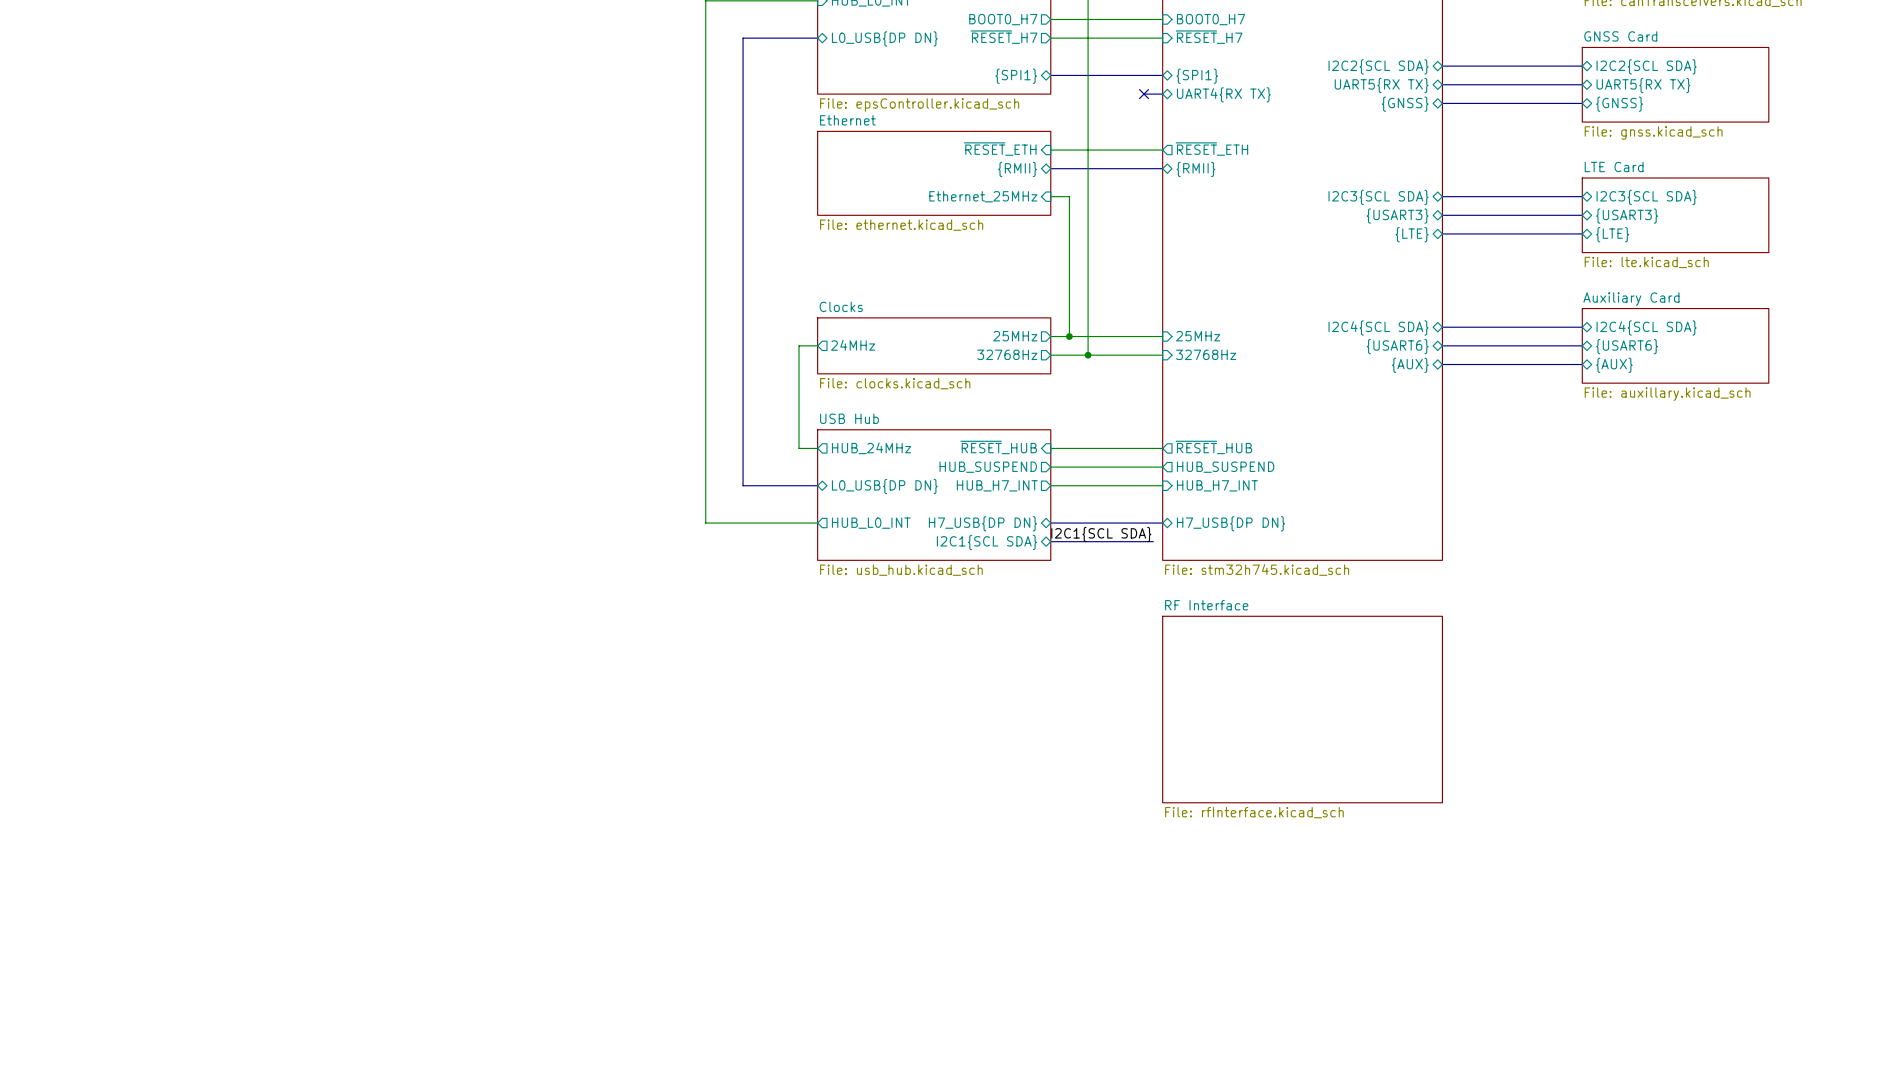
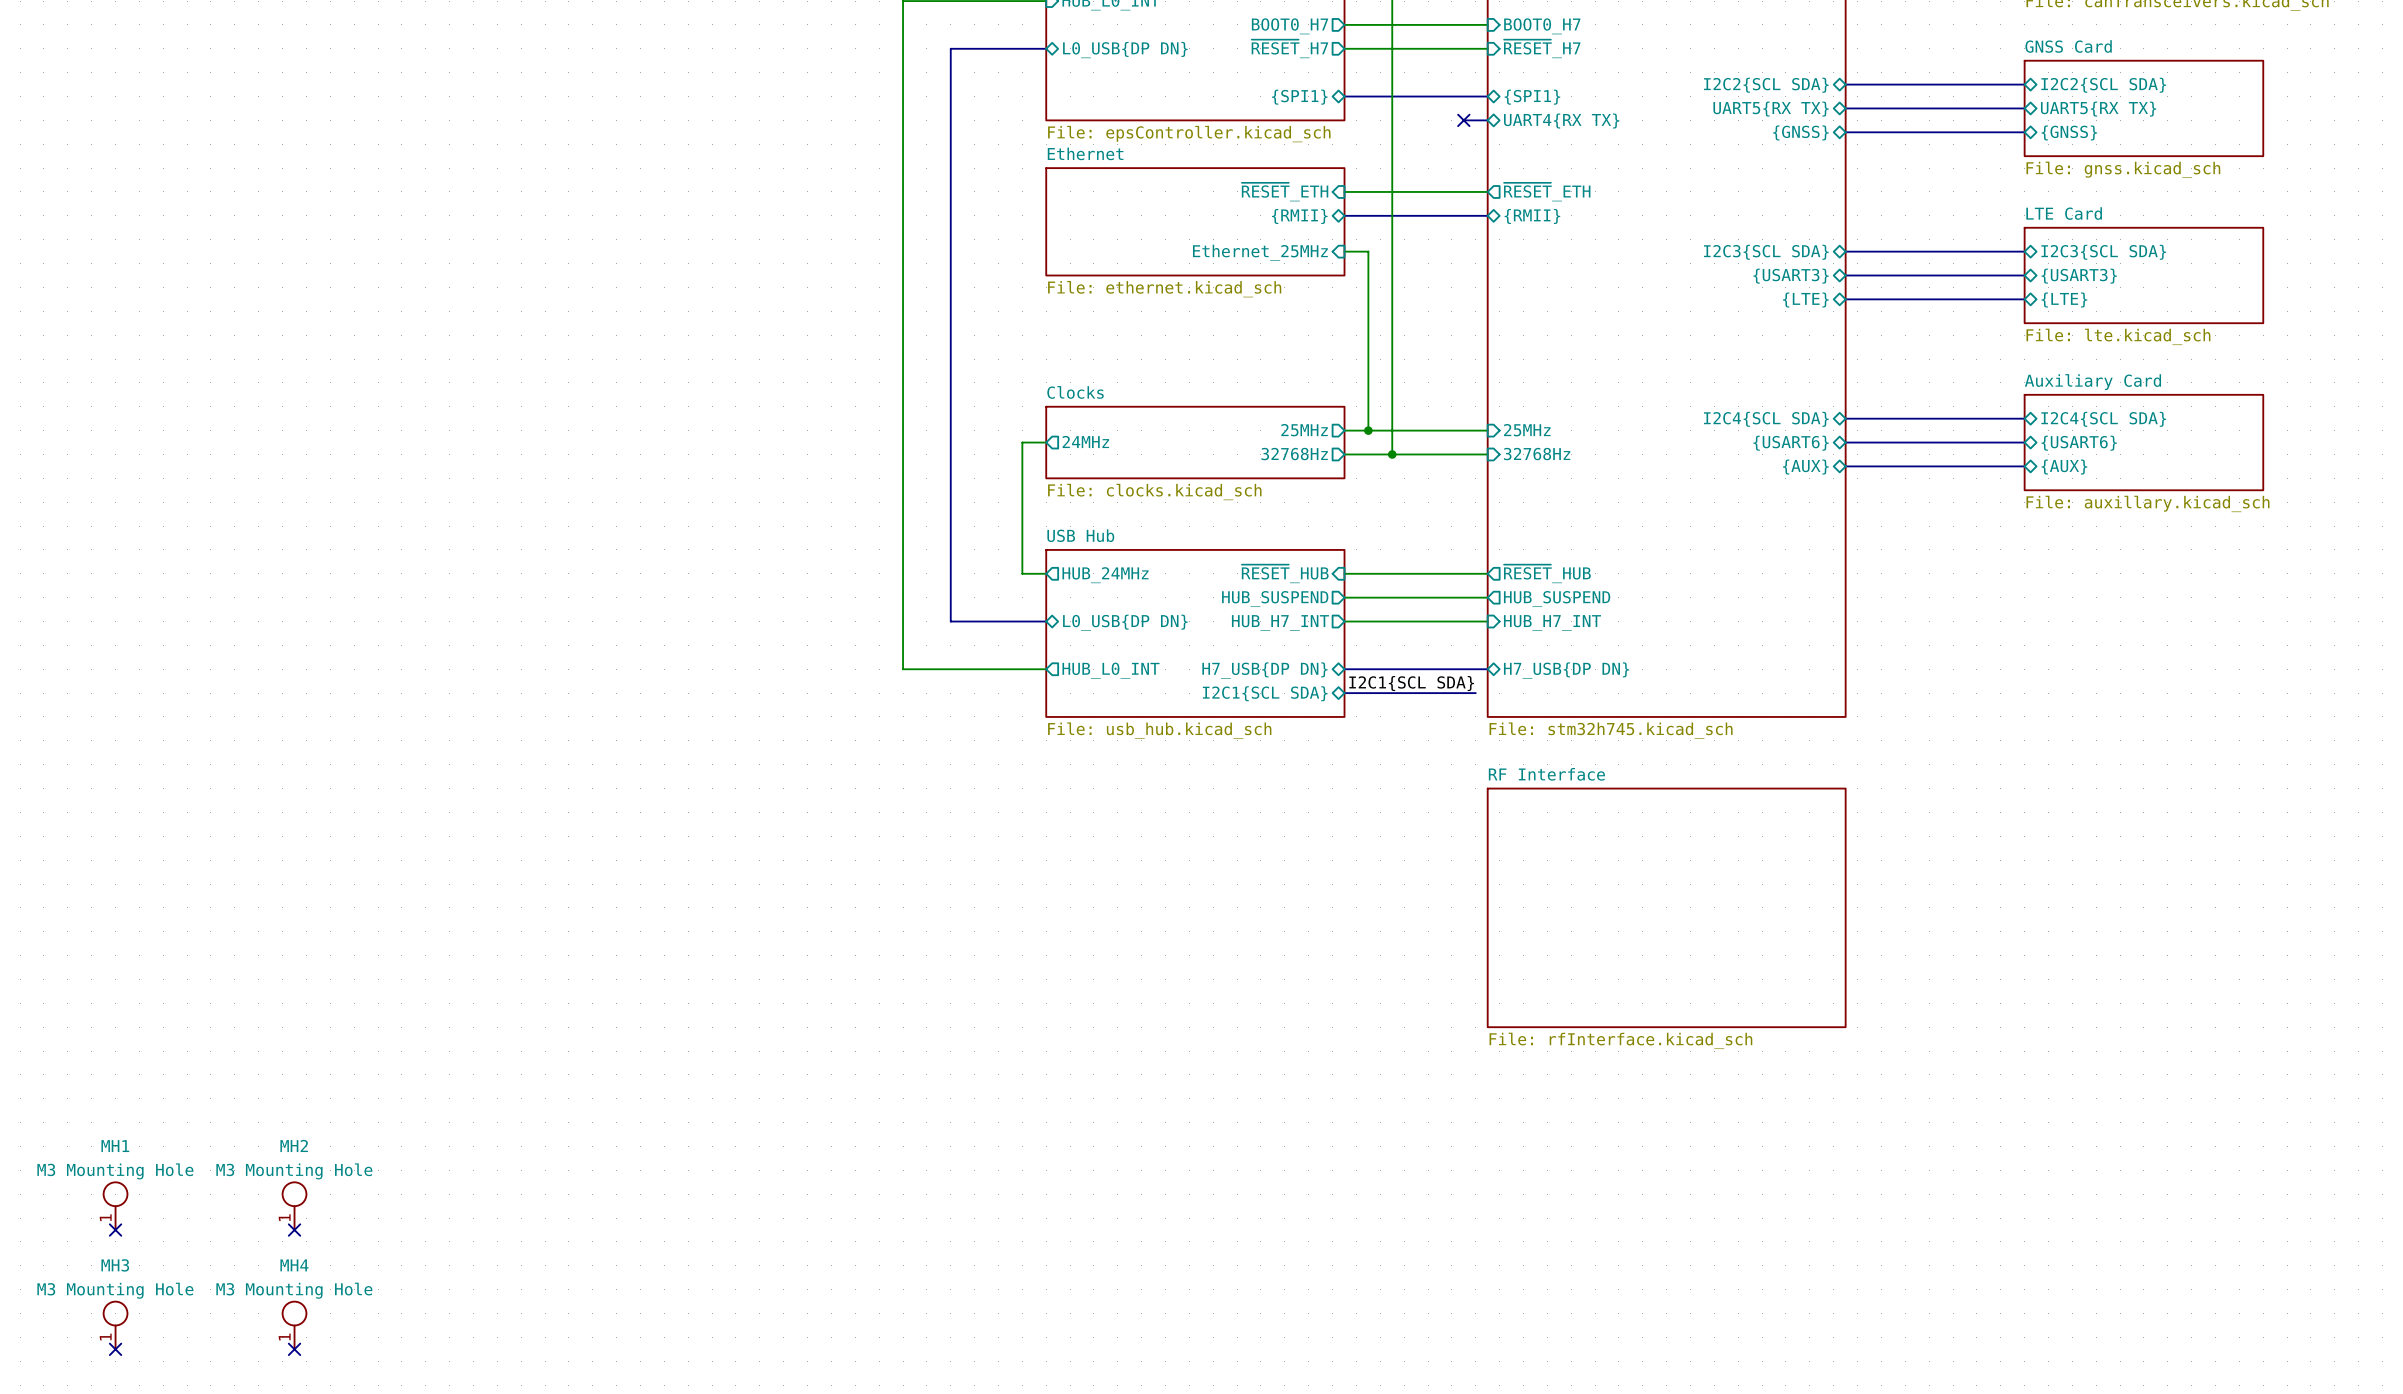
MH1: none -> M3 Mounting Hole (115, 1206)
MH2: none -> M3 Mounting Hole (294, 1206)
no-connect mark: none -> (115, 1230)
no-connect mark: none -> (294, 1230)
MH3: none -> M3 Mounting Hole (115, 1325)
MH4: none -> M3 Mounting Hole (294, 1325)
no-connect mark: none -> (115, 1349)
no-connect mark: none -> (294, 1349)

